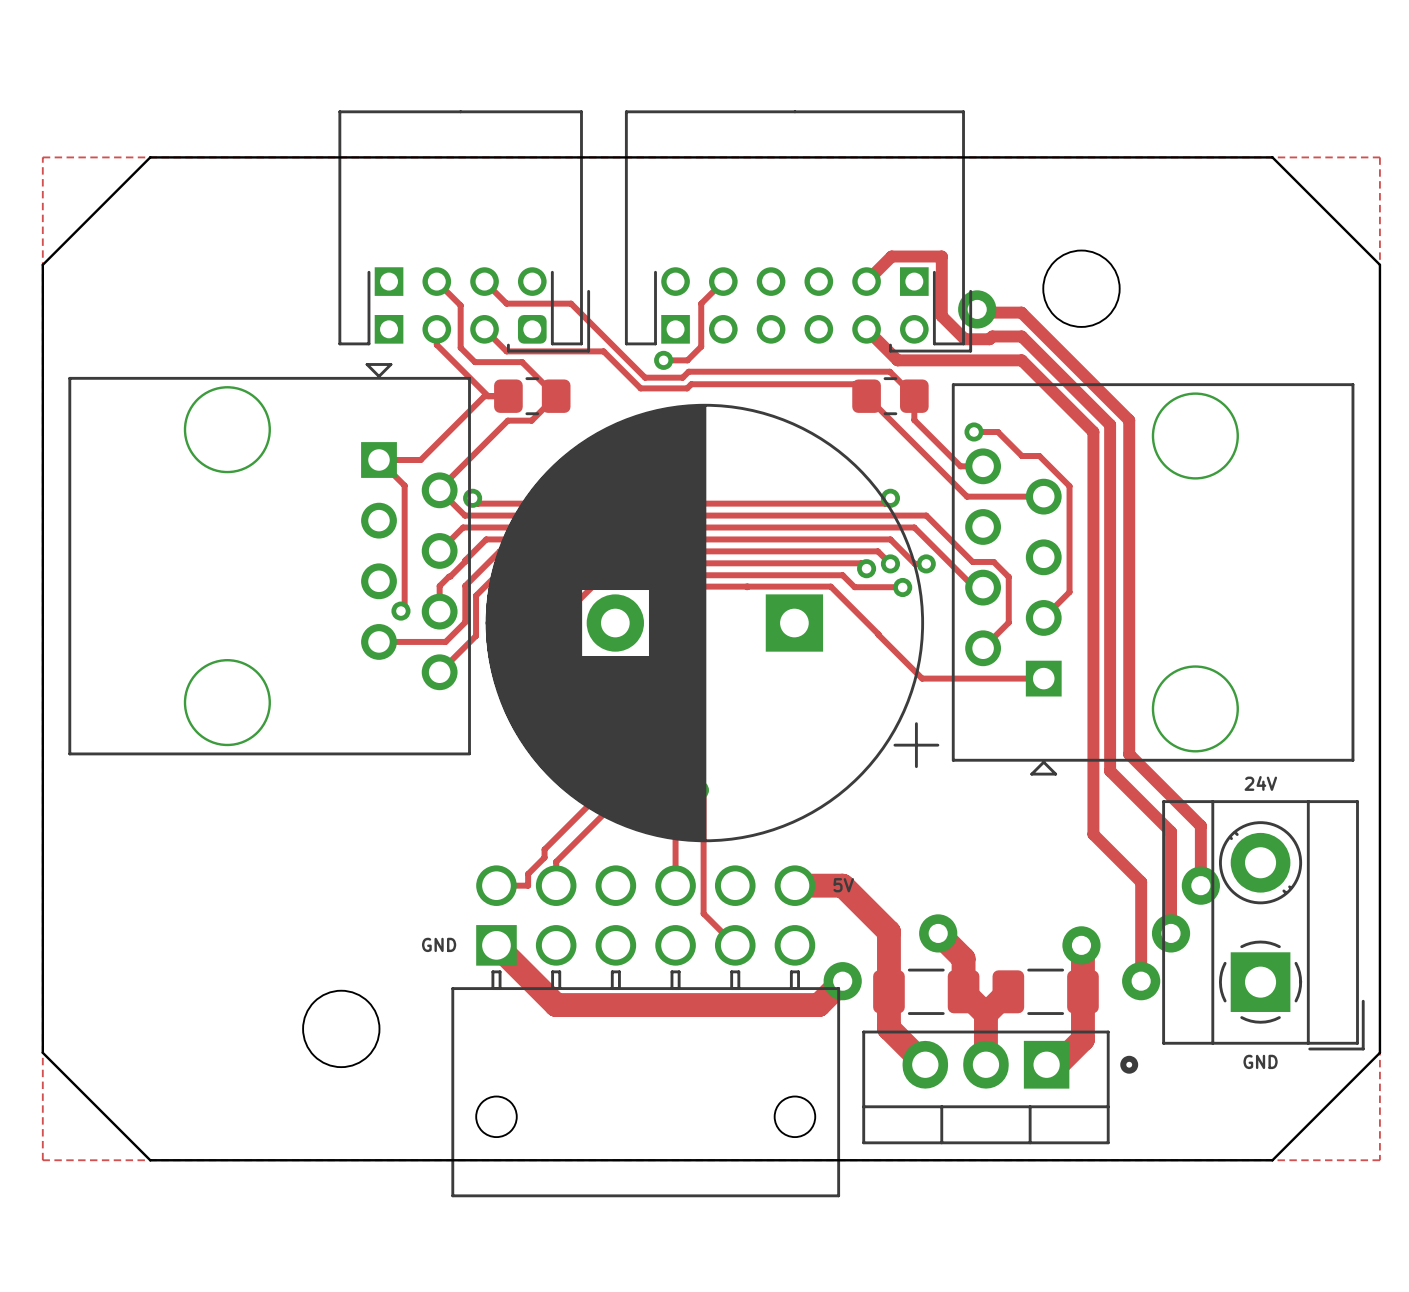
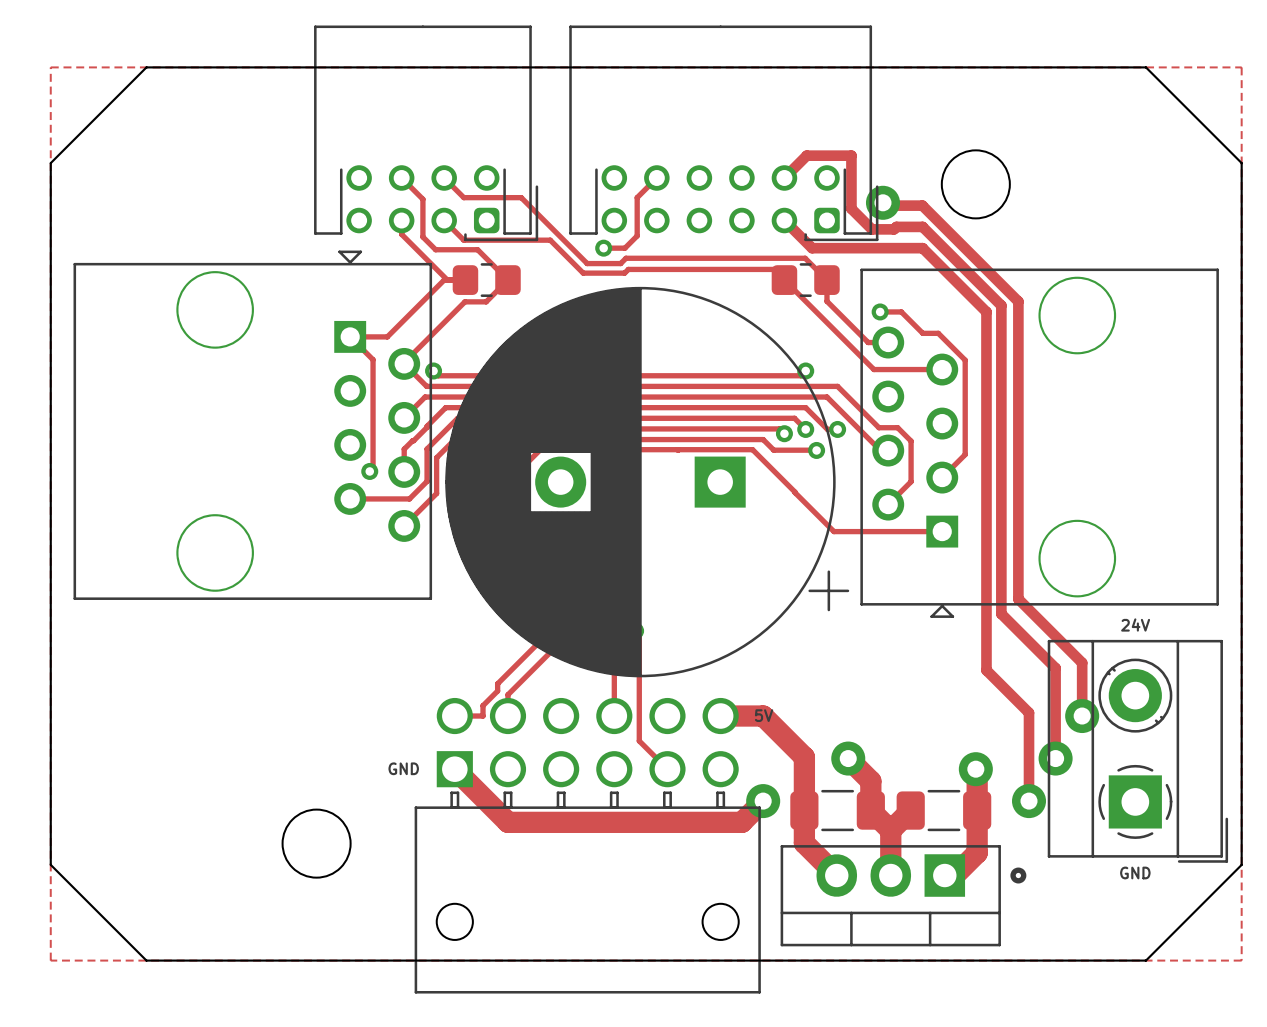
part footprint: [338, 110, 591, 353] -> [314, 25, 539, 242]
part footprint: [624, 110, 973, 353] -> [569, 25, 879, 242]

